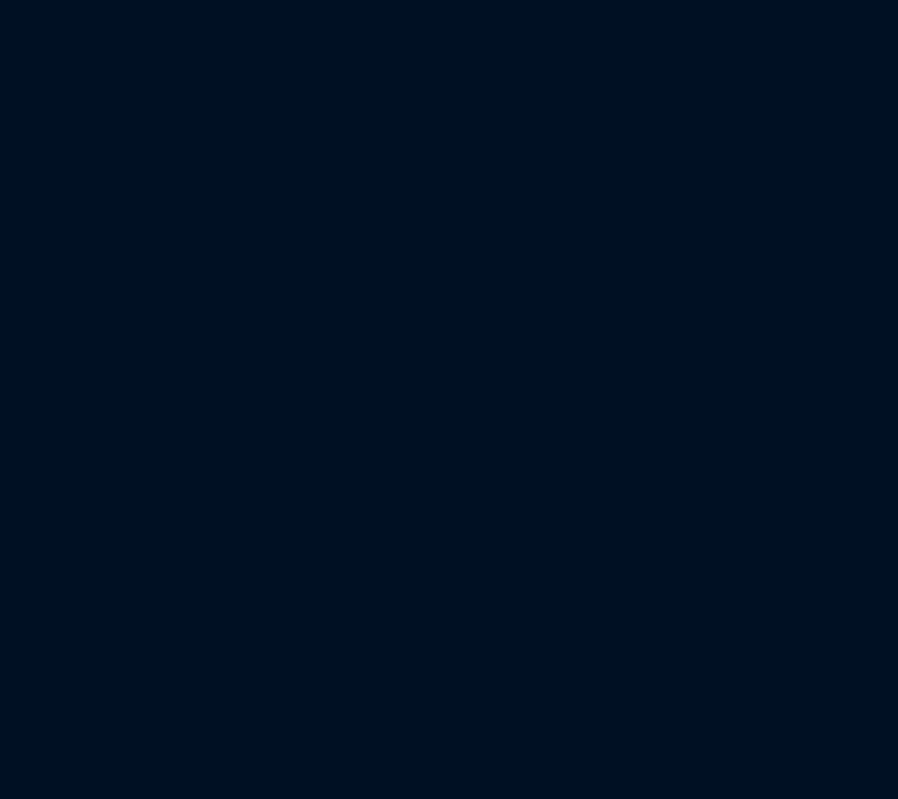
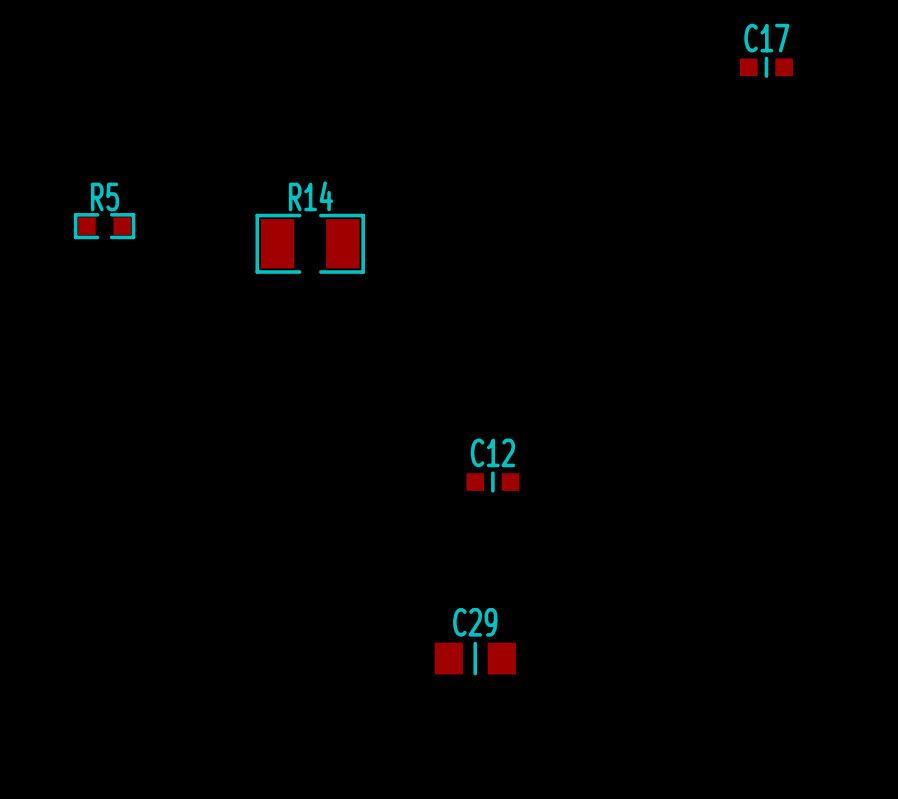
C17: none -> (766, 67)
R5: none -> (104, 226)
R14: none -> (310, 243)
C12: none -> (492, 482)
C29: none -> (475, 658)

